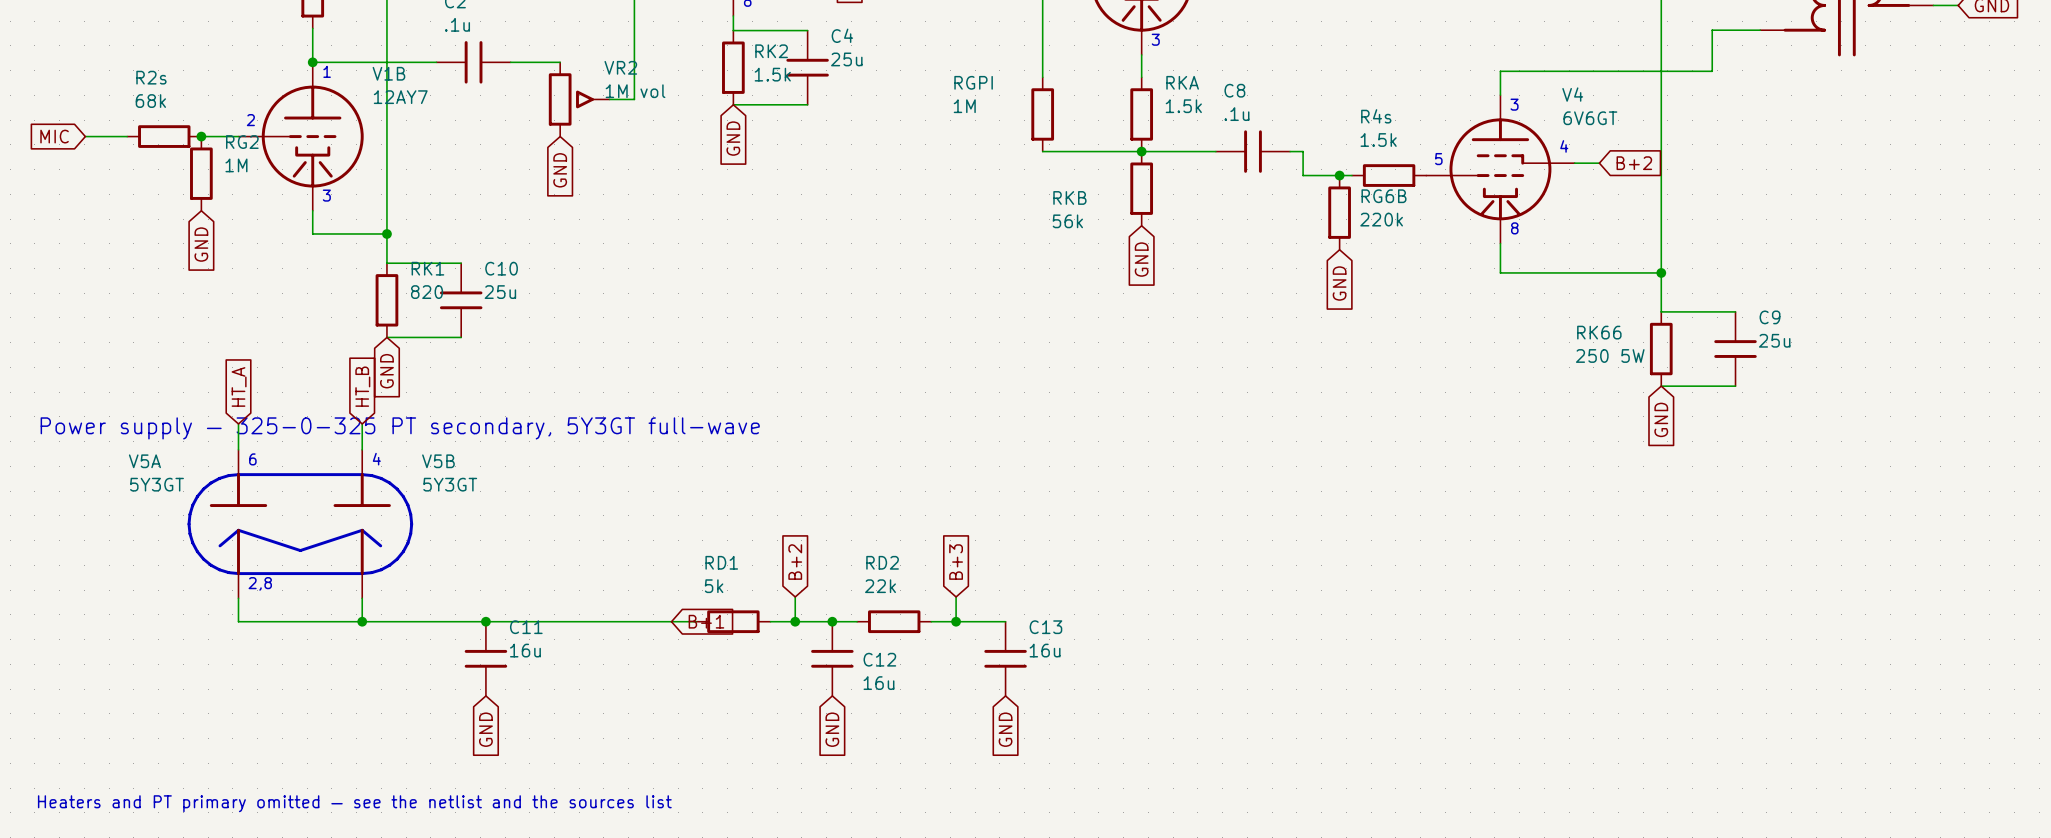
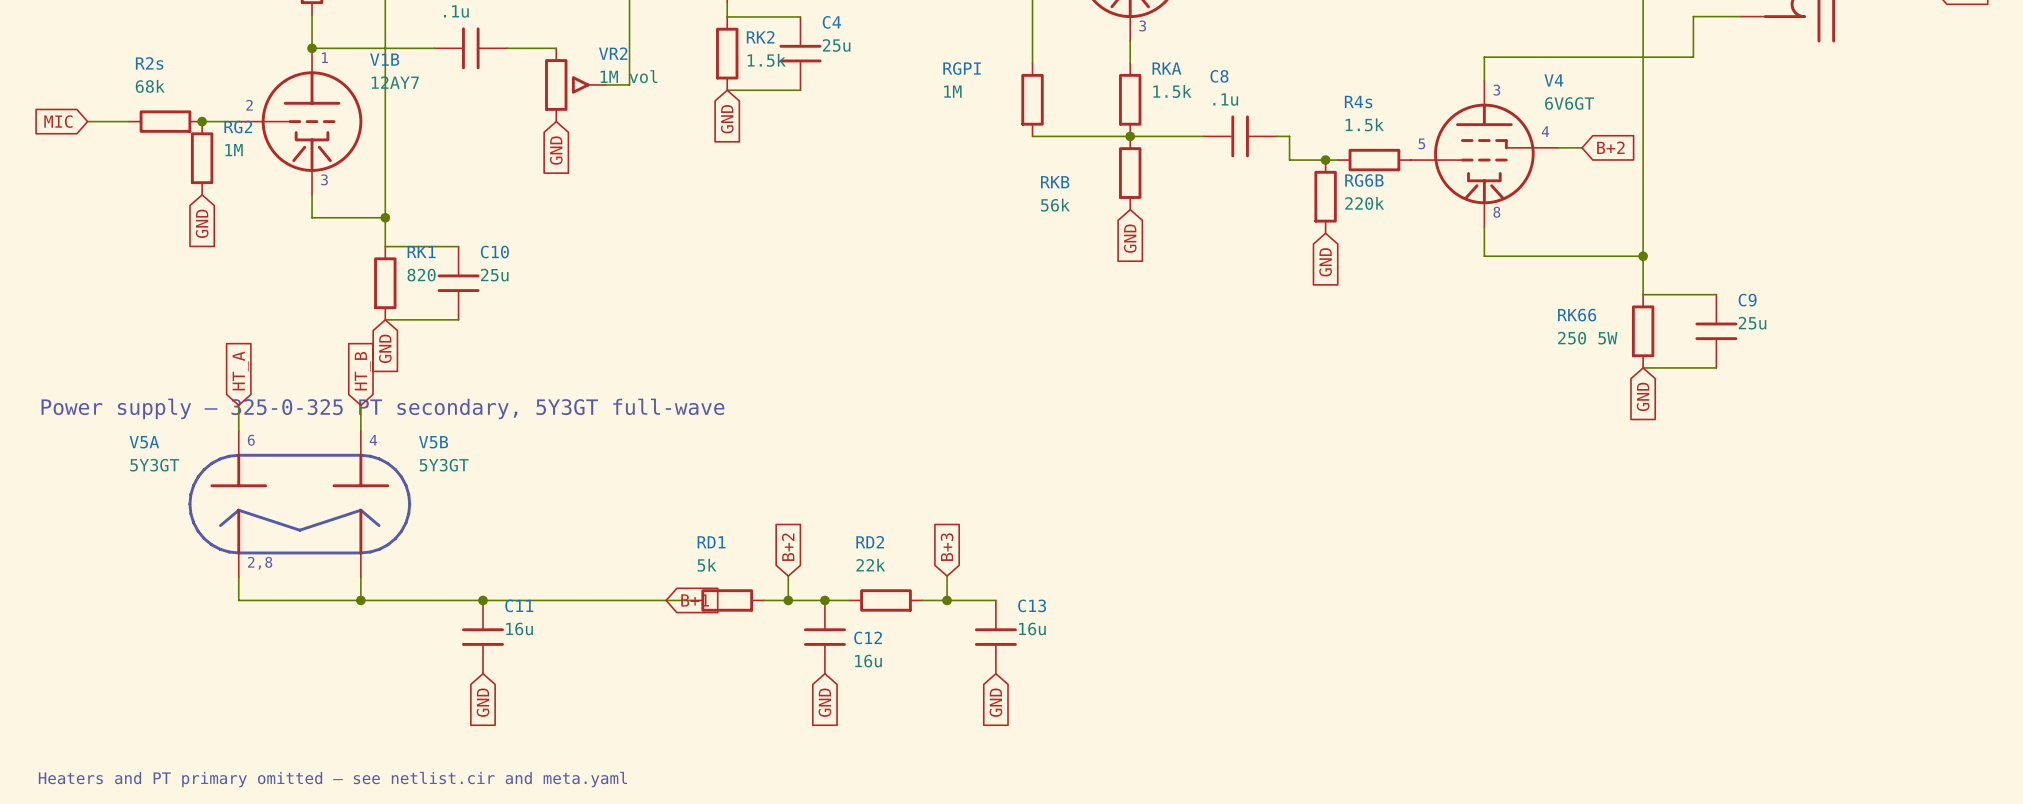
text: Heaters and PT primary omitted — see the netlist and the sources list (354, 803) -> Heaters and PT primary omitted — see netlist.cir and meta.yaml (332, 779)

